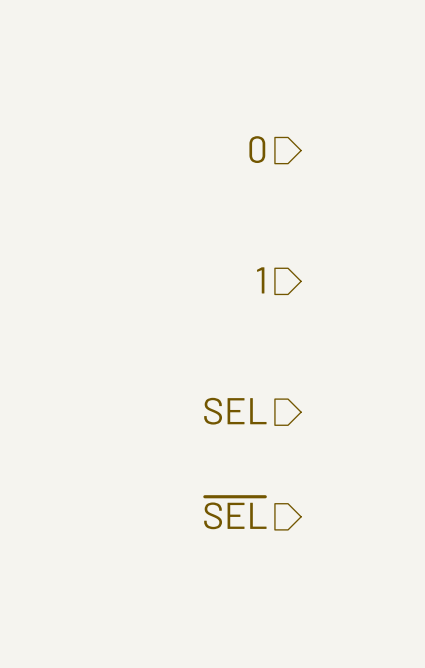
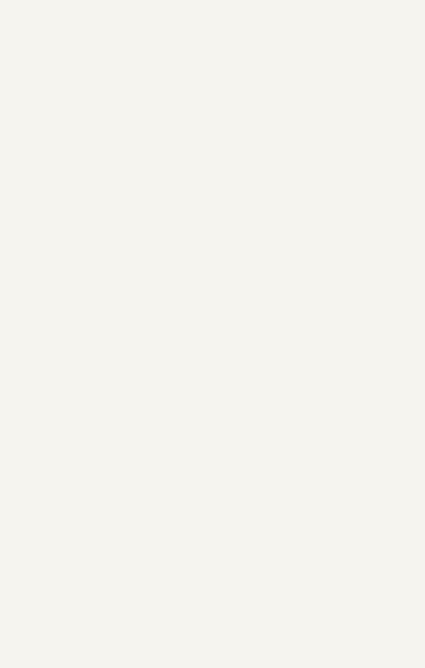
hierarchical label: 0 (257, 149) -> none
hierarchical label: 1 (260, 280) -> none
hierarchical label: SEL (235, 411) -> none
hierarchical label: ~{SEL} (235, 512) -> none

